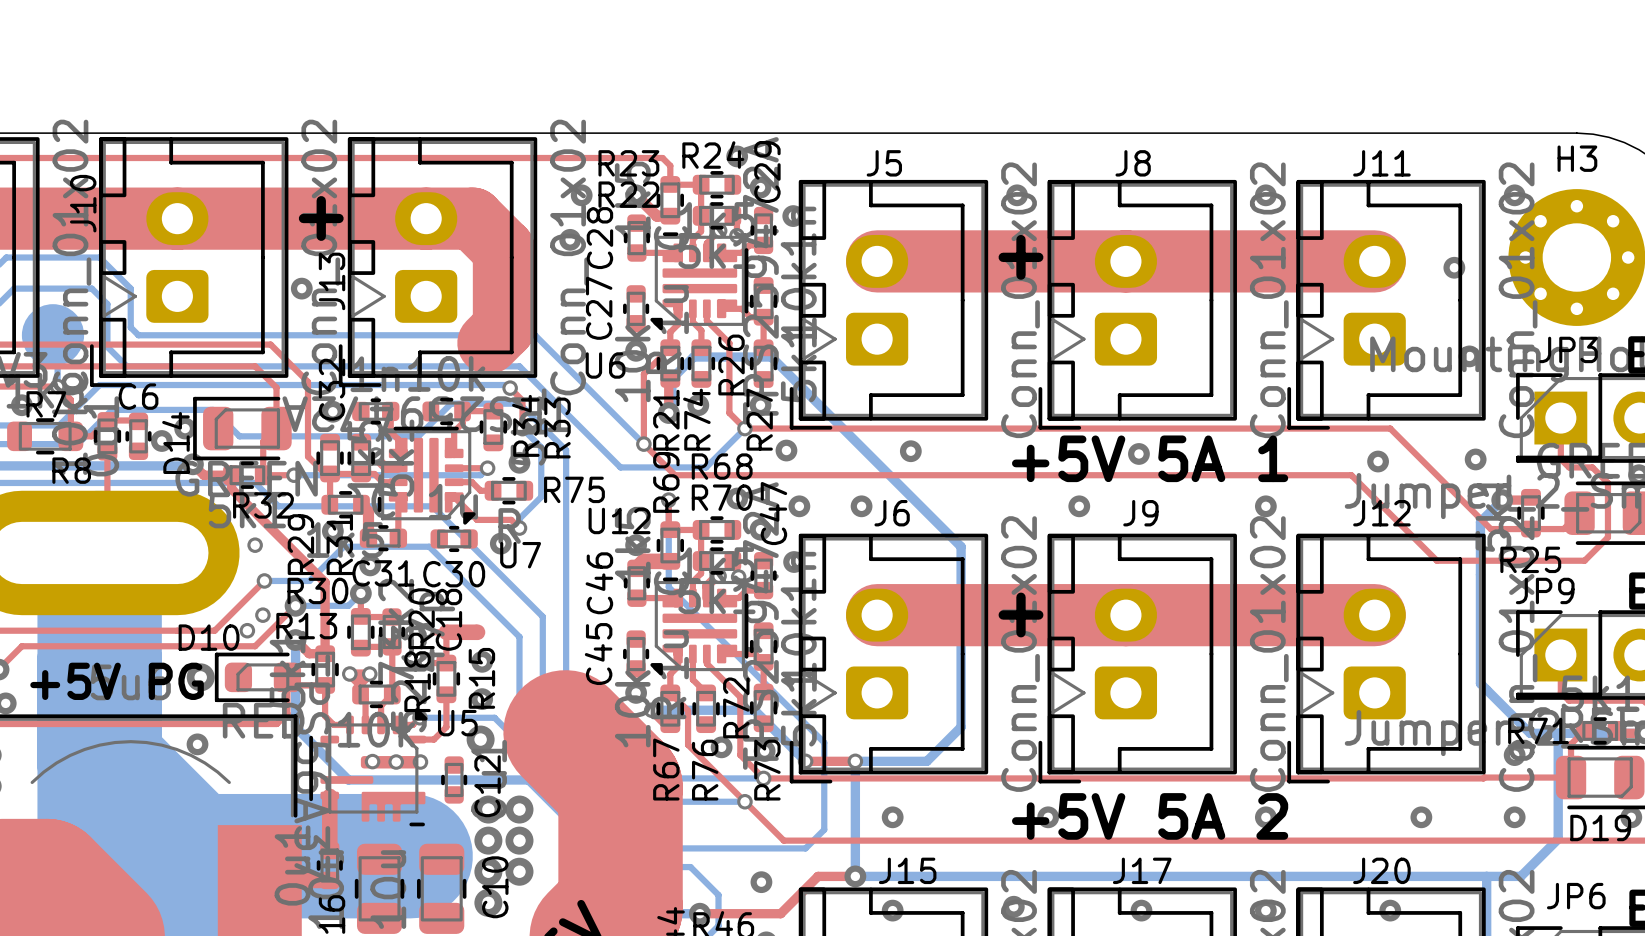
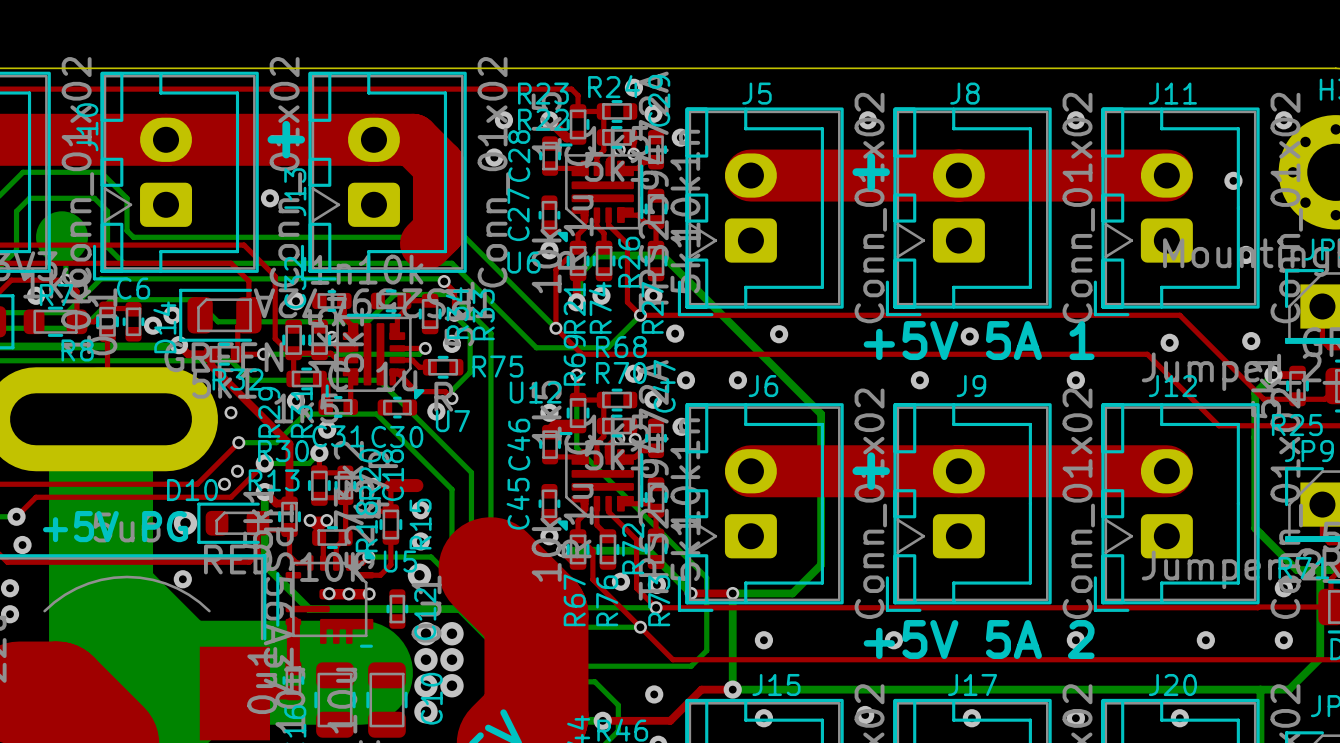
U6 footprint: [650, 232, 749, 331] -> [557, 143, 644, 243]
U7 footprint: [377, 426, 476, 525] -> [325, 313, 425, 400]
U12 footprint: [650, 577, 749, 676] -> [557, 432, 644, 531]

